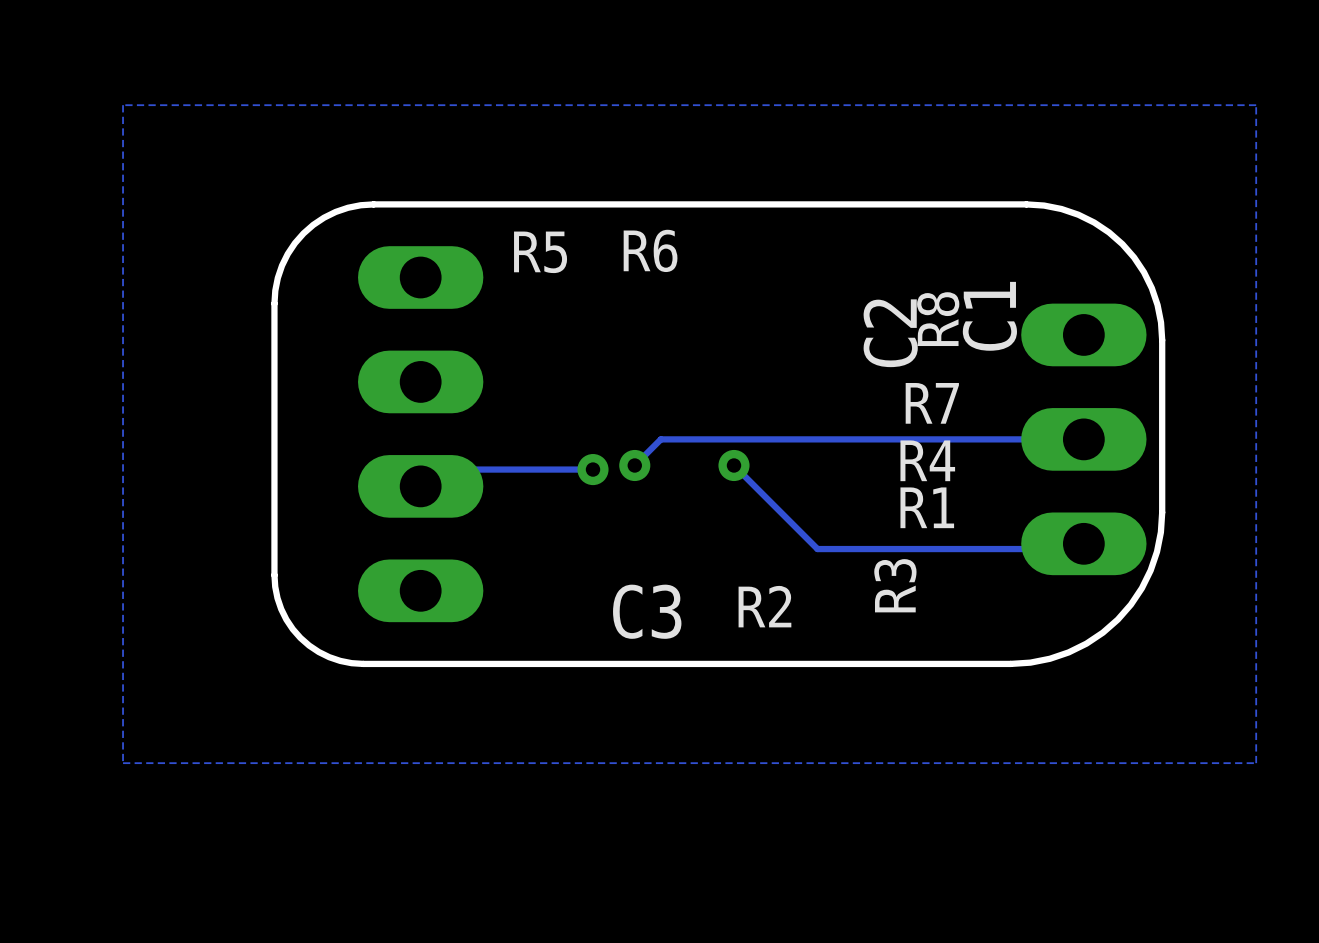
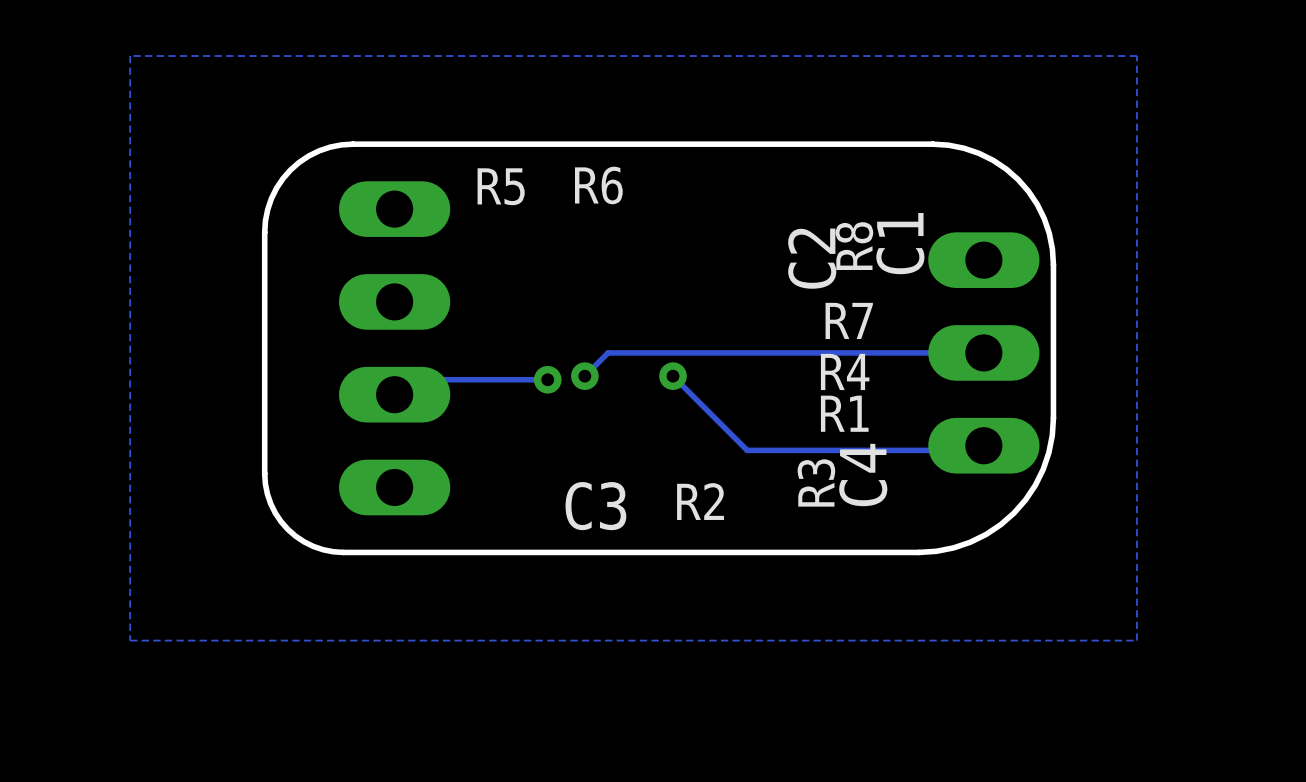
C4: none -> (863, 475)

